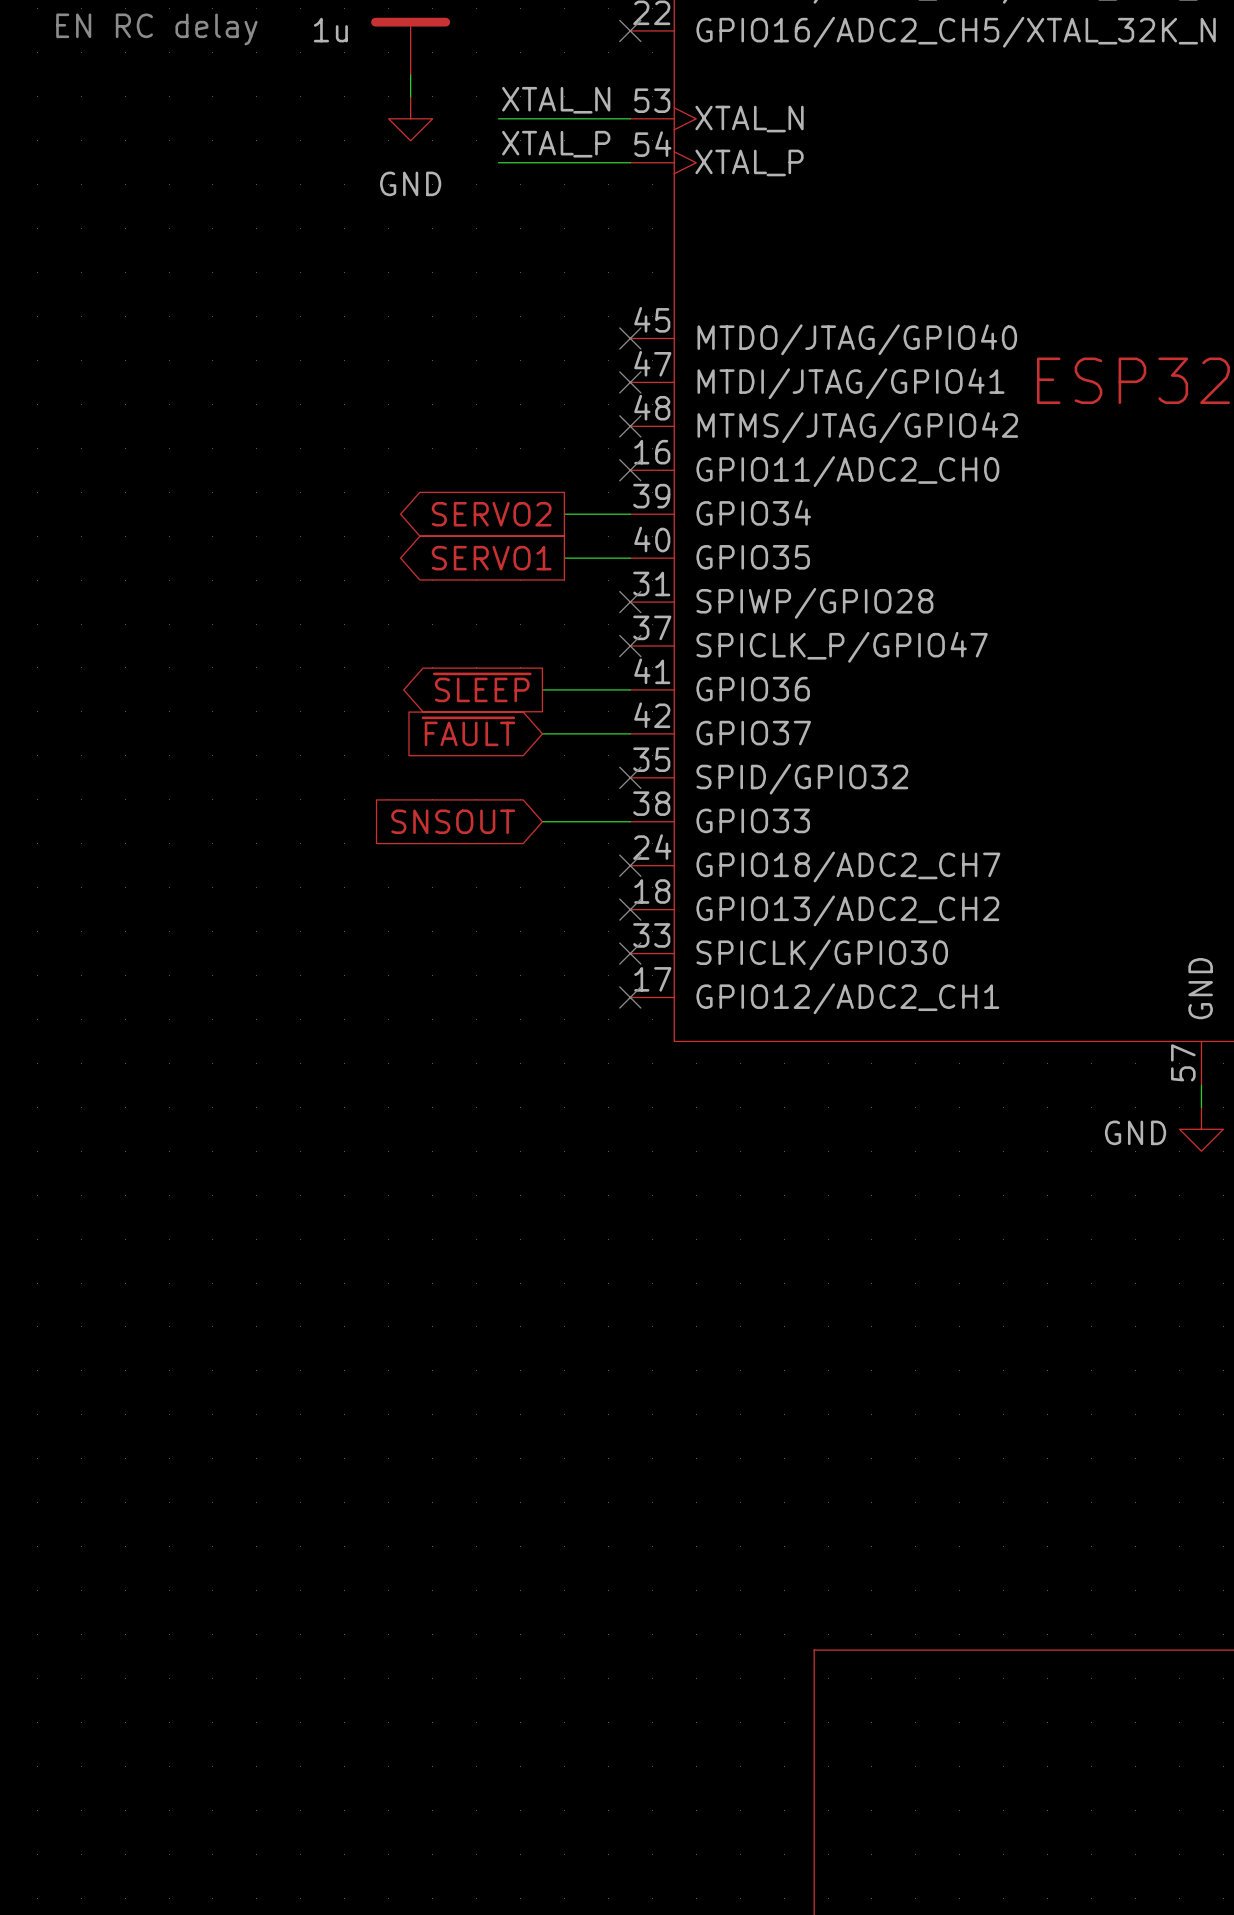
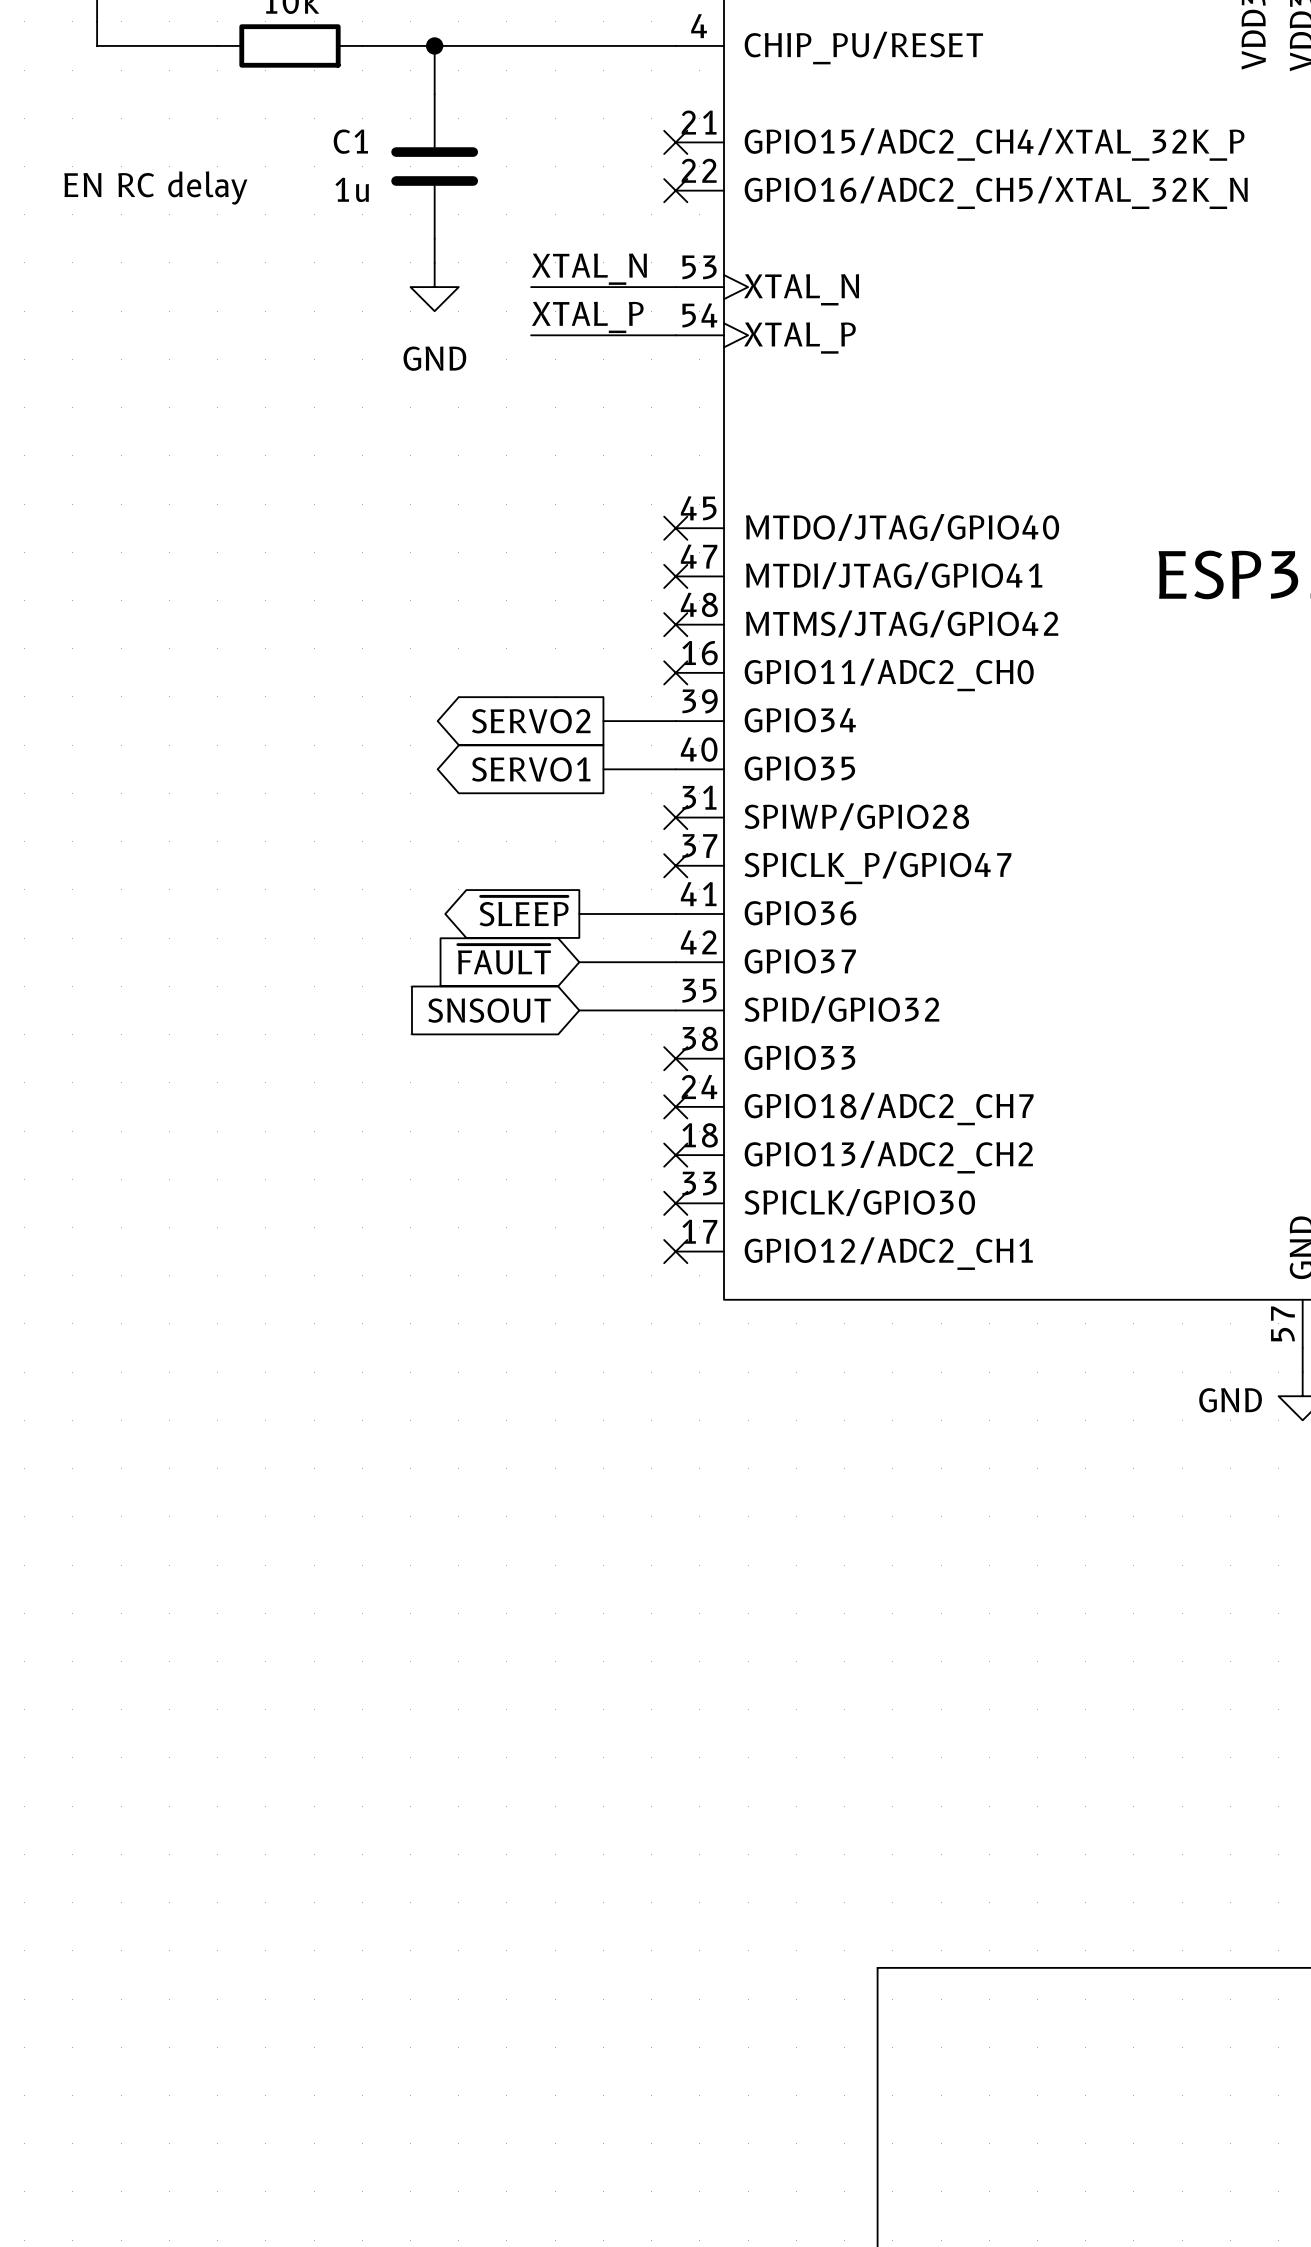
no-connect mark position: (630, 777) -> (675, 1058)
global label position: SNSOUT (453, 821) -> SNSOUT (489, 1010)
wire: (542, 821) (630, 821) -> (579, 1010) (675, 1010)

